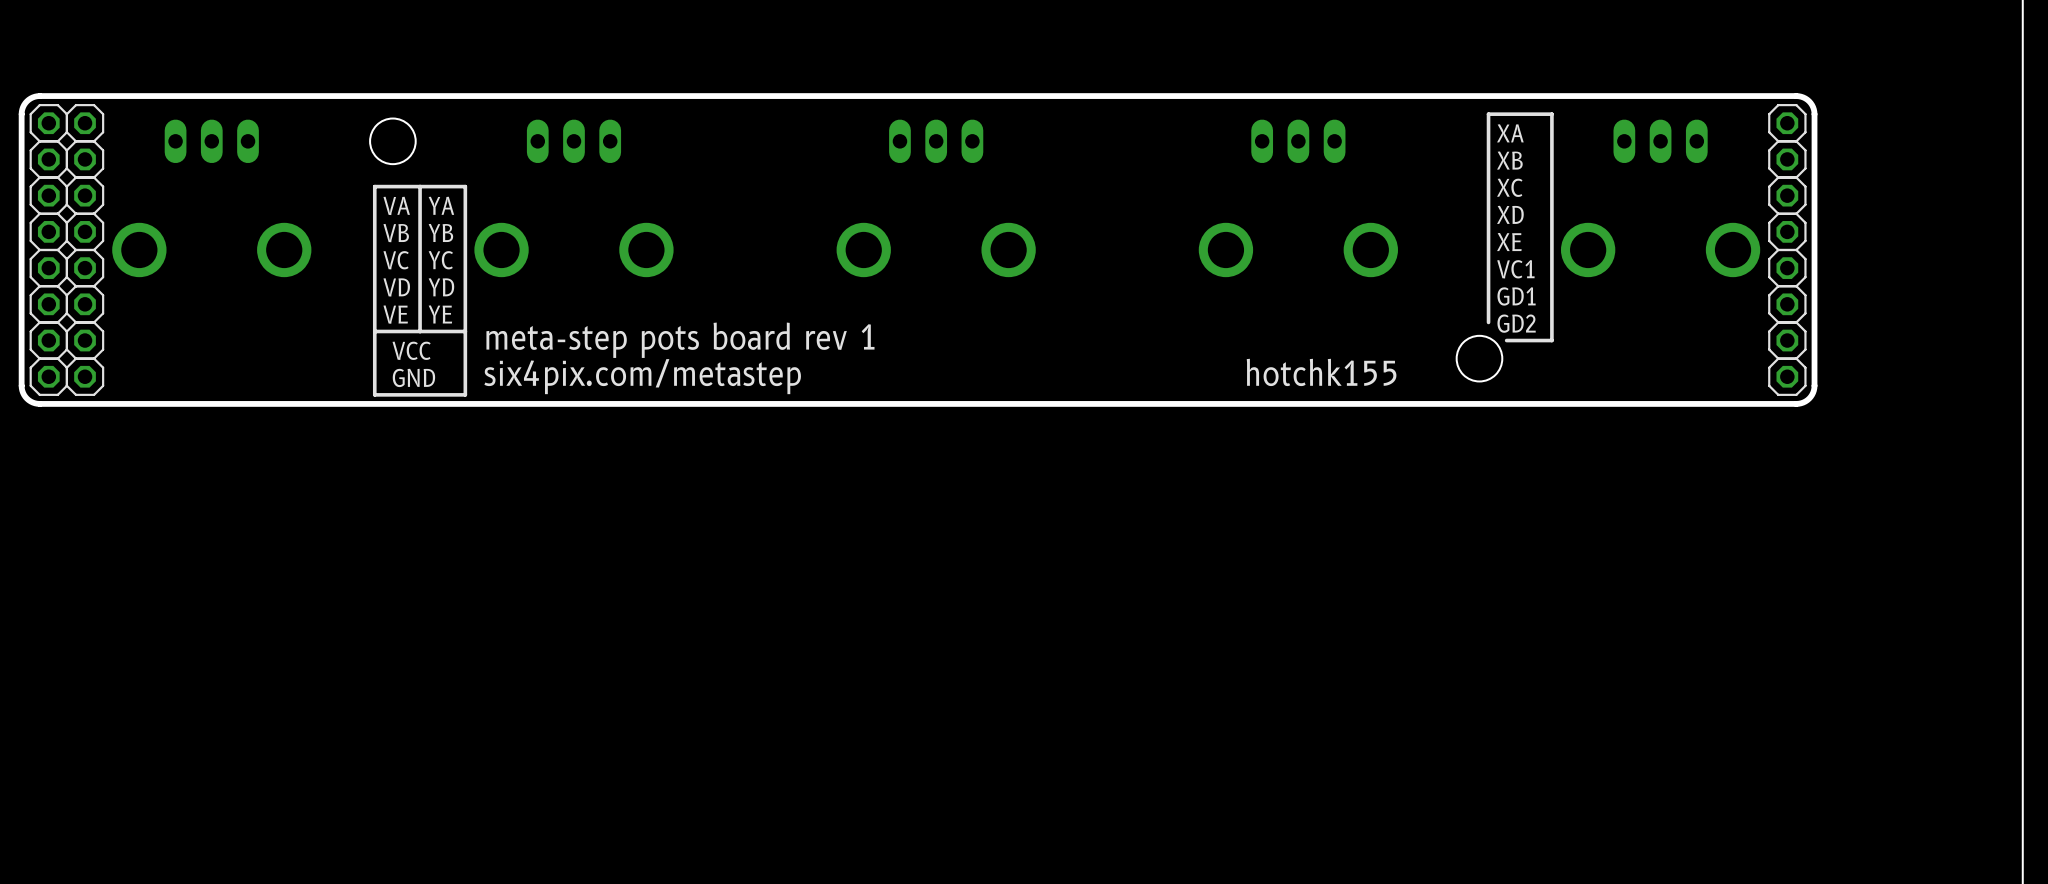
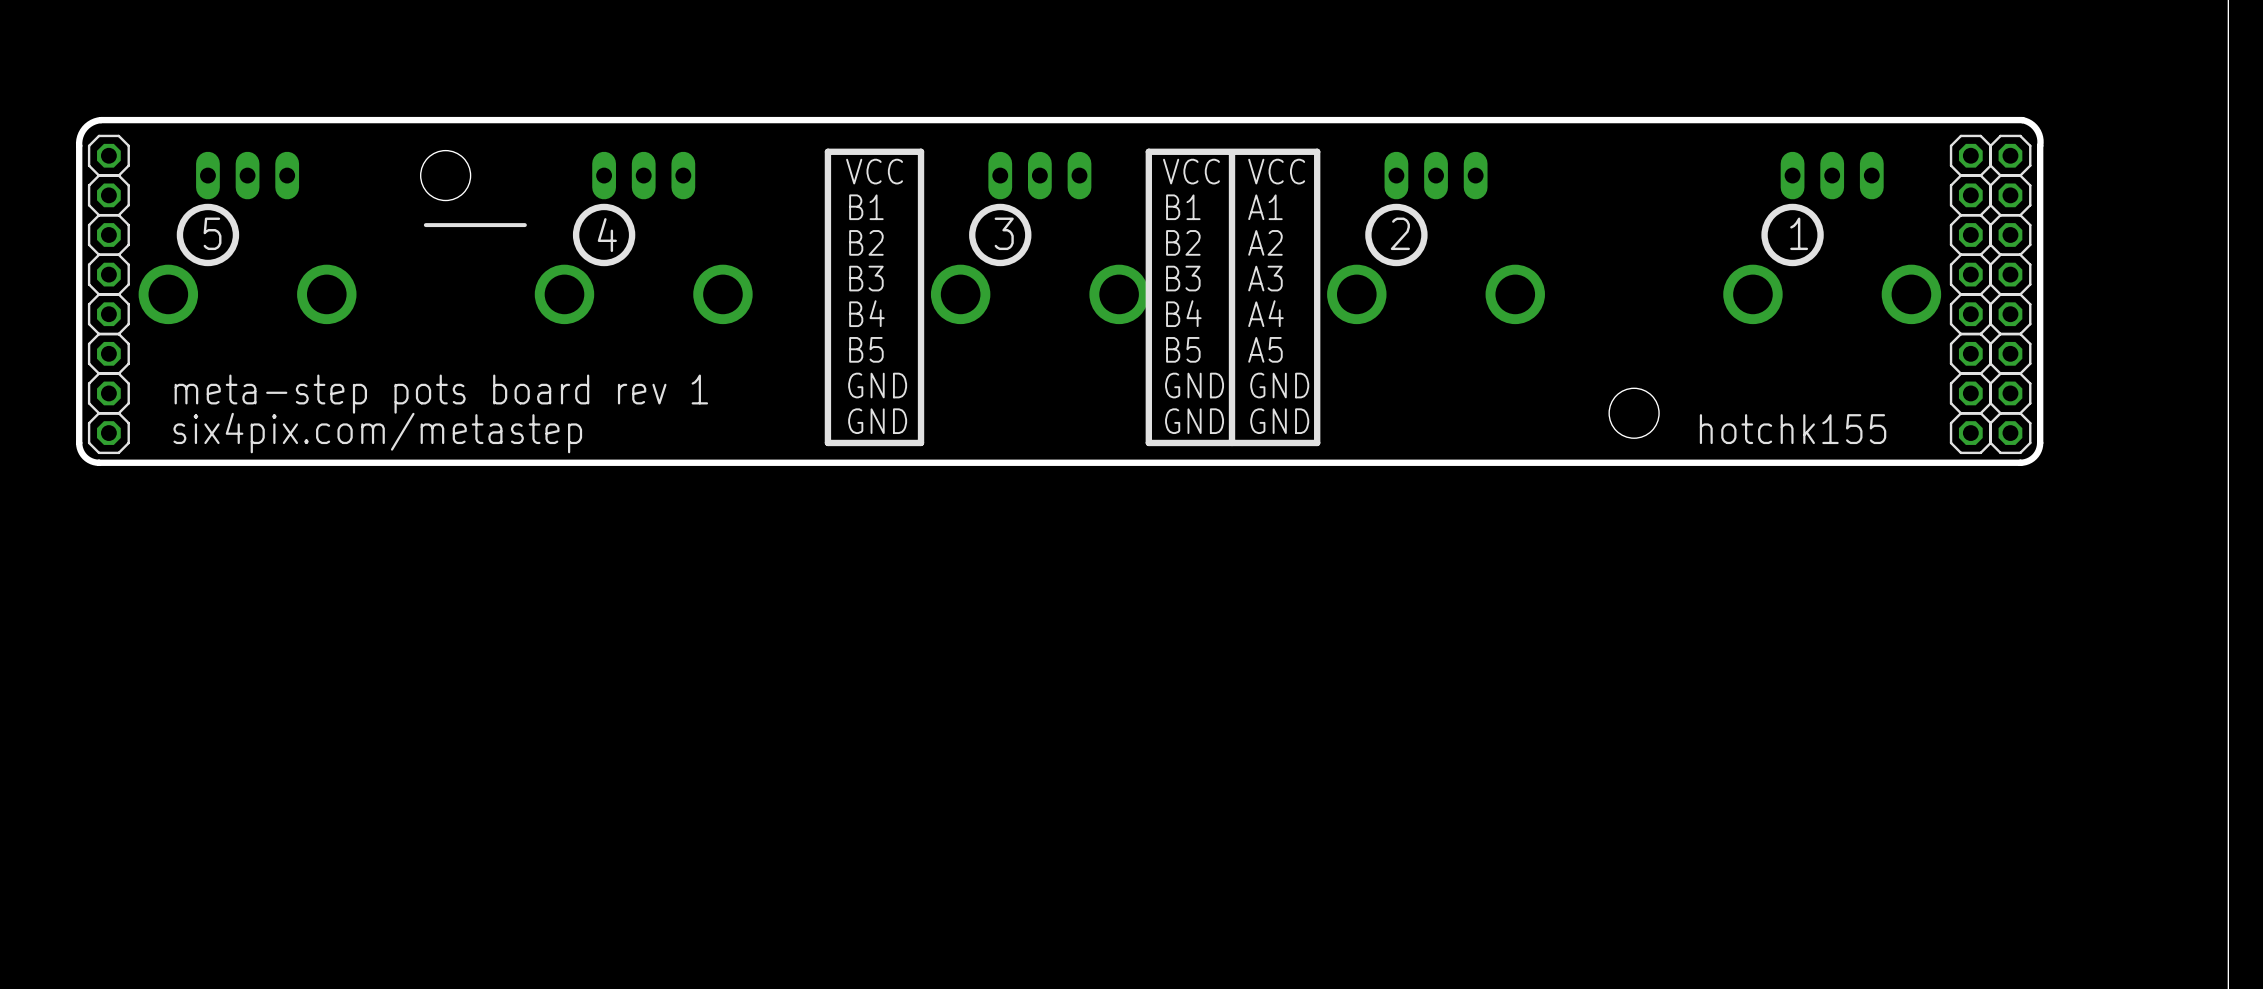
line: none -> (921, 151) (827, 151) (827, 442) (921, 442) (921, 151)
line: none -> (1317, 151) (1317, 442) (1148, 442) (1148, 151) (1317, 151)
line: none -> (1232, 153) (1232, 442)
VA: (48, 123) -> none
part: none -> (2010, 155)
XA name: XA (1510, 133) -> none
text: none -> VCC (874, 171)
text: none -> VCC (1191, 171)
text: none -> VCC (1276, 171)
VB: (48, 159) -> none
part: none -> (2010, 195)
XB name: XB (1509, 160) -> none
drawing: none -> [176, 203, 240, 267]
drawing: none -> [572, 203, 636, 267]
drawing: none -> [969, 203, 1032, 267]
drawing: none -> [1365, 203, 1428, 267]
drawing: none -> [1761, 203, 1824, 267]
text: none -> B1 (866, 207)
text: none -> B1 (1183, 207)
text: none -> A1 (1265, 207)
line: (420, 186) (420, 331) -> none
line: (465, 186) (465, 394) (374, 394) (374, 186) -> none
XC name: XC (1509, 187) -> none
text: none -> 5 (212, 233)
text: none -> 3 (1004, 233)
text: none -> 2 (1400, 233)
text: none -> 1 (1799, 233)
VC: (48, 195) -> none
part: none -> (2010, 234)
text: none -> 4 (607, 235)
text: none -> B2 (866, 242)
text: none -> B2 (1183, 242)
text: none -> A2 (1265, 242)
YA name: YA (441, 205) -> none
XD name: XD (1510, 214) -> none
VD: (48, 231) -> none
part: none -> (2010, 274)
YB name: YB (440, 232) -> none
text: none -> B3 (866, 278)
text: none -> B3 (1183, 278)
text: none -> A3 (1265, 278)
XE name: XE (1509, 242) -> none
YC name: YC (440, 260) -> none
VE: (48, 268) -> none
text: none -> B4 (866, 313)
text: none -> B4 (1183, 313)
text: none -> A4 (1265, 313)
part: none -> (2010, 314)
VC1 name: VC1 (1515, 269) -> none
YD name: YD (441, 287) -> none
GD1 name: GD1 (1516, 296) -> none
text: none -> B5 (866, 349)
text: none -> B5 (1183, 349)
text: none -> A5 (1265, 349)
VCC: (48, 304) -> none
part: none -> (2010, 353)
YE name: YE (440, 314) -> none
line: (1488, 322) (1488, 114) (1551, 114) (1551, 340) (1506, 340) -> none
GD2 name: GD2 (1516, 323) -> none
line: (465, 331) (374, 331) -> none
text: none -> GND (877, 385)
text: none -> GND (1194, 385)
text: none -> GND (1279, 385)
GND: (48, 340) -> none
text position: meta-step pots board rev 1 (680, 340) -> meta-step pots board rev 1 (441, 394)
part: none -> (2010, 393)
text: none -> GND (877, 421)
text: none -> GND (1194, 421)
text: none -> GND (1279, 421)
text position: hotchk155 (1321, 372) -> hotchk155 (1793, 429)
part: (48, 376) -> none
text position: six4pix.com/metastep (642, 376) -> six4pix.com/metastep (377, 433)
part: none -> (2010, 433)
board edge: (1796, 403) (1809, 398) (1814, 385) (1814, 114) (1810, 103) (1798, 96) (37, 96) (25, 103) (21, 114) (21, 388) (25, 396) (35, 403) (75, 403) -> (1980, 462) (2025, 462) (2036, 455) (2040, 445) (2040, 140) (2034, 127) (2022, 120) (97, 120) (84, 128) (79, 142) (79, 442) (80, 450) (85, 456) (91, 461) (99, 462)

